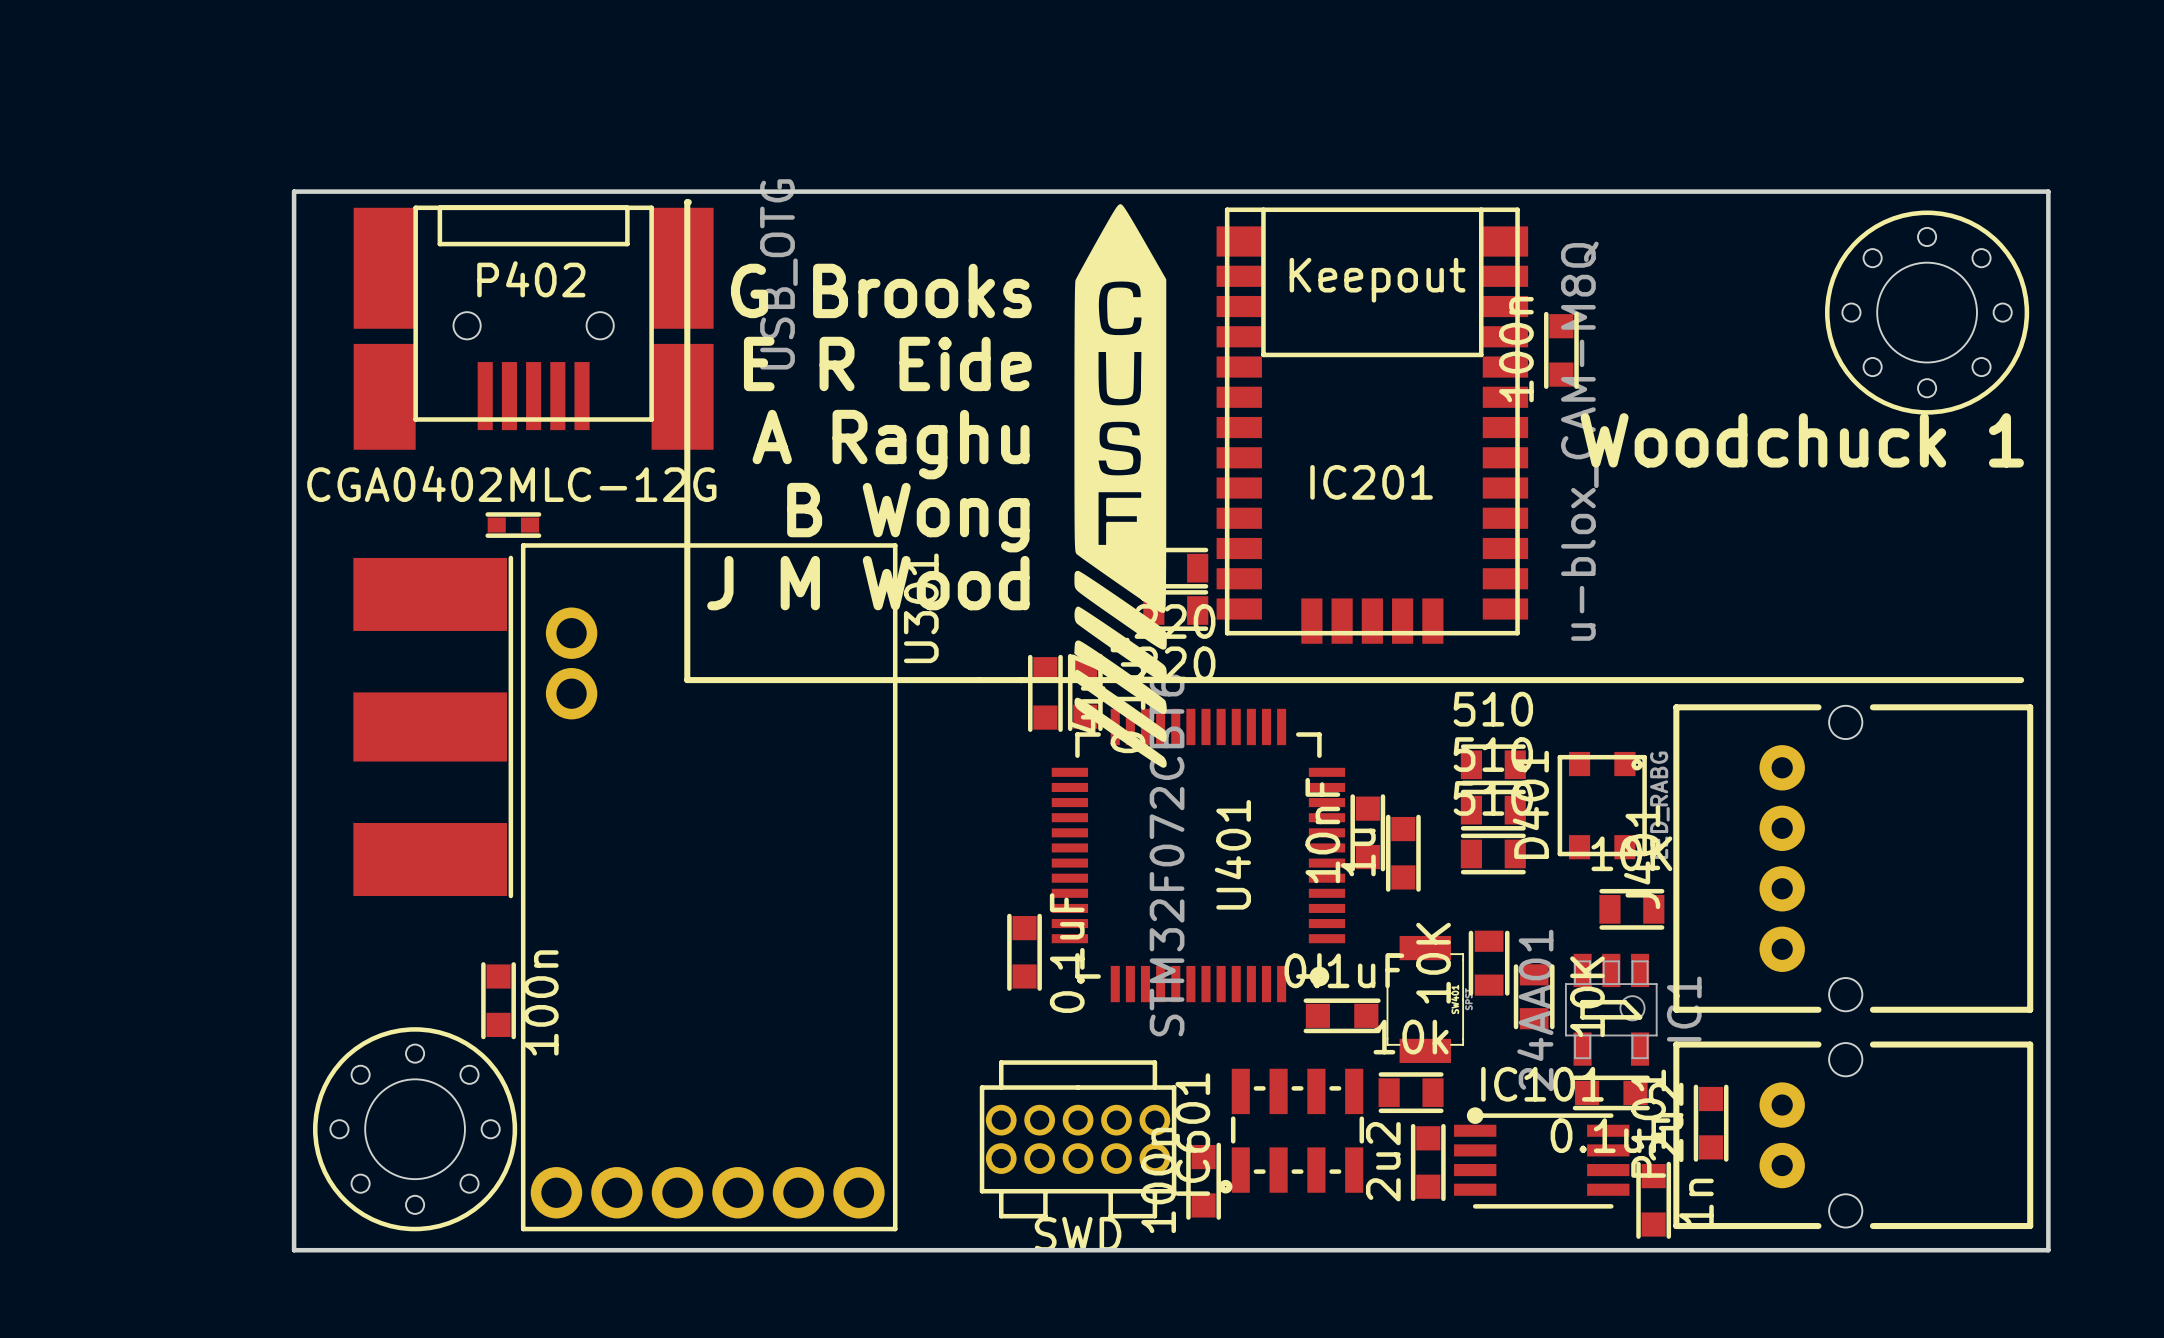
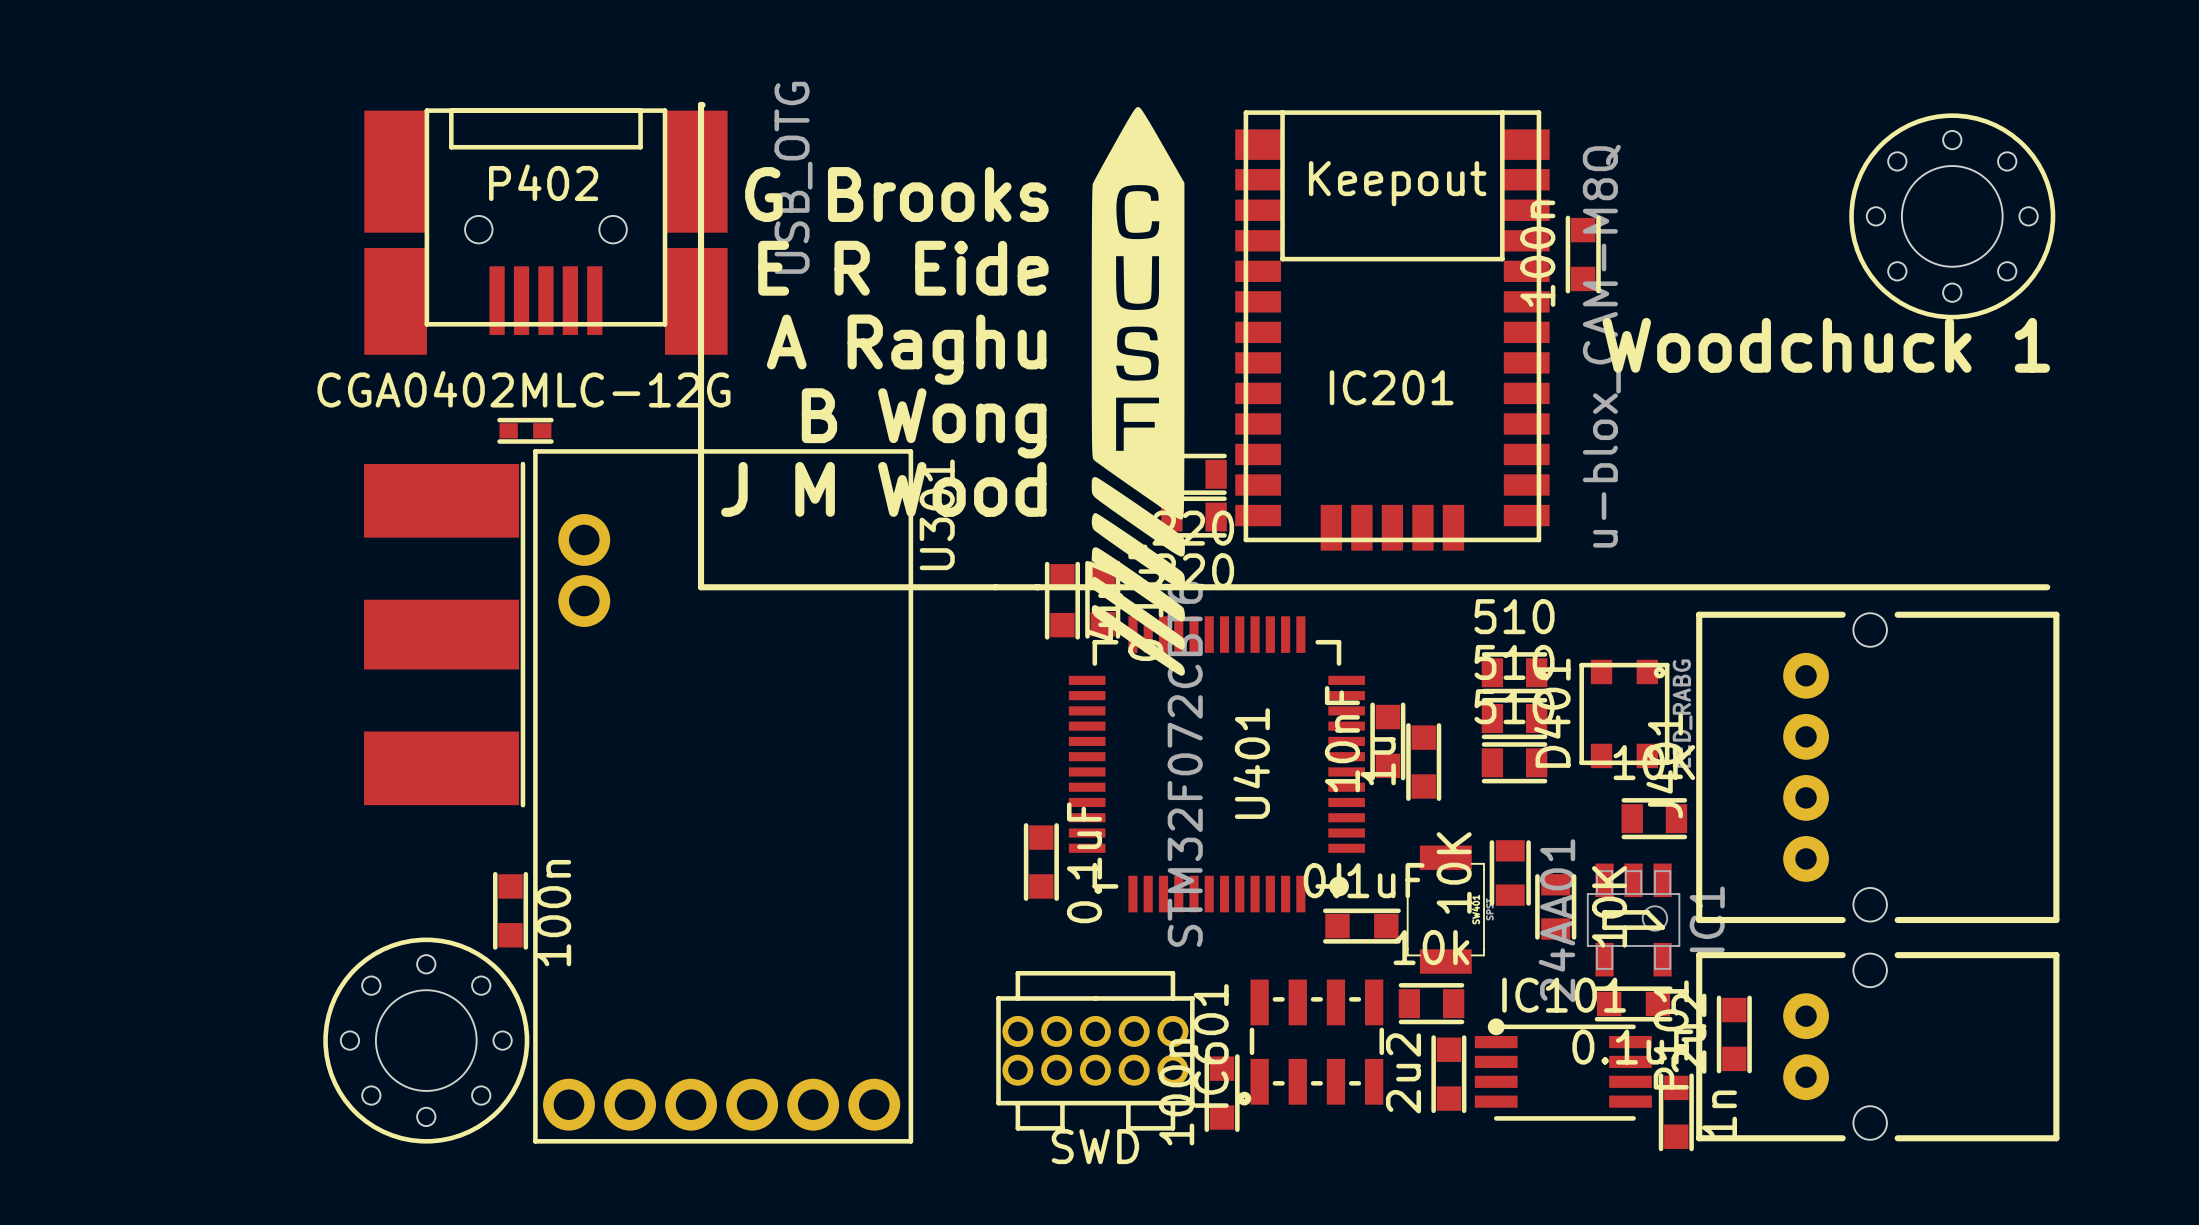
board edge: (294, 191) (2048, 191) (2048, 1250) (294, 1250) (294, 191) -> none

